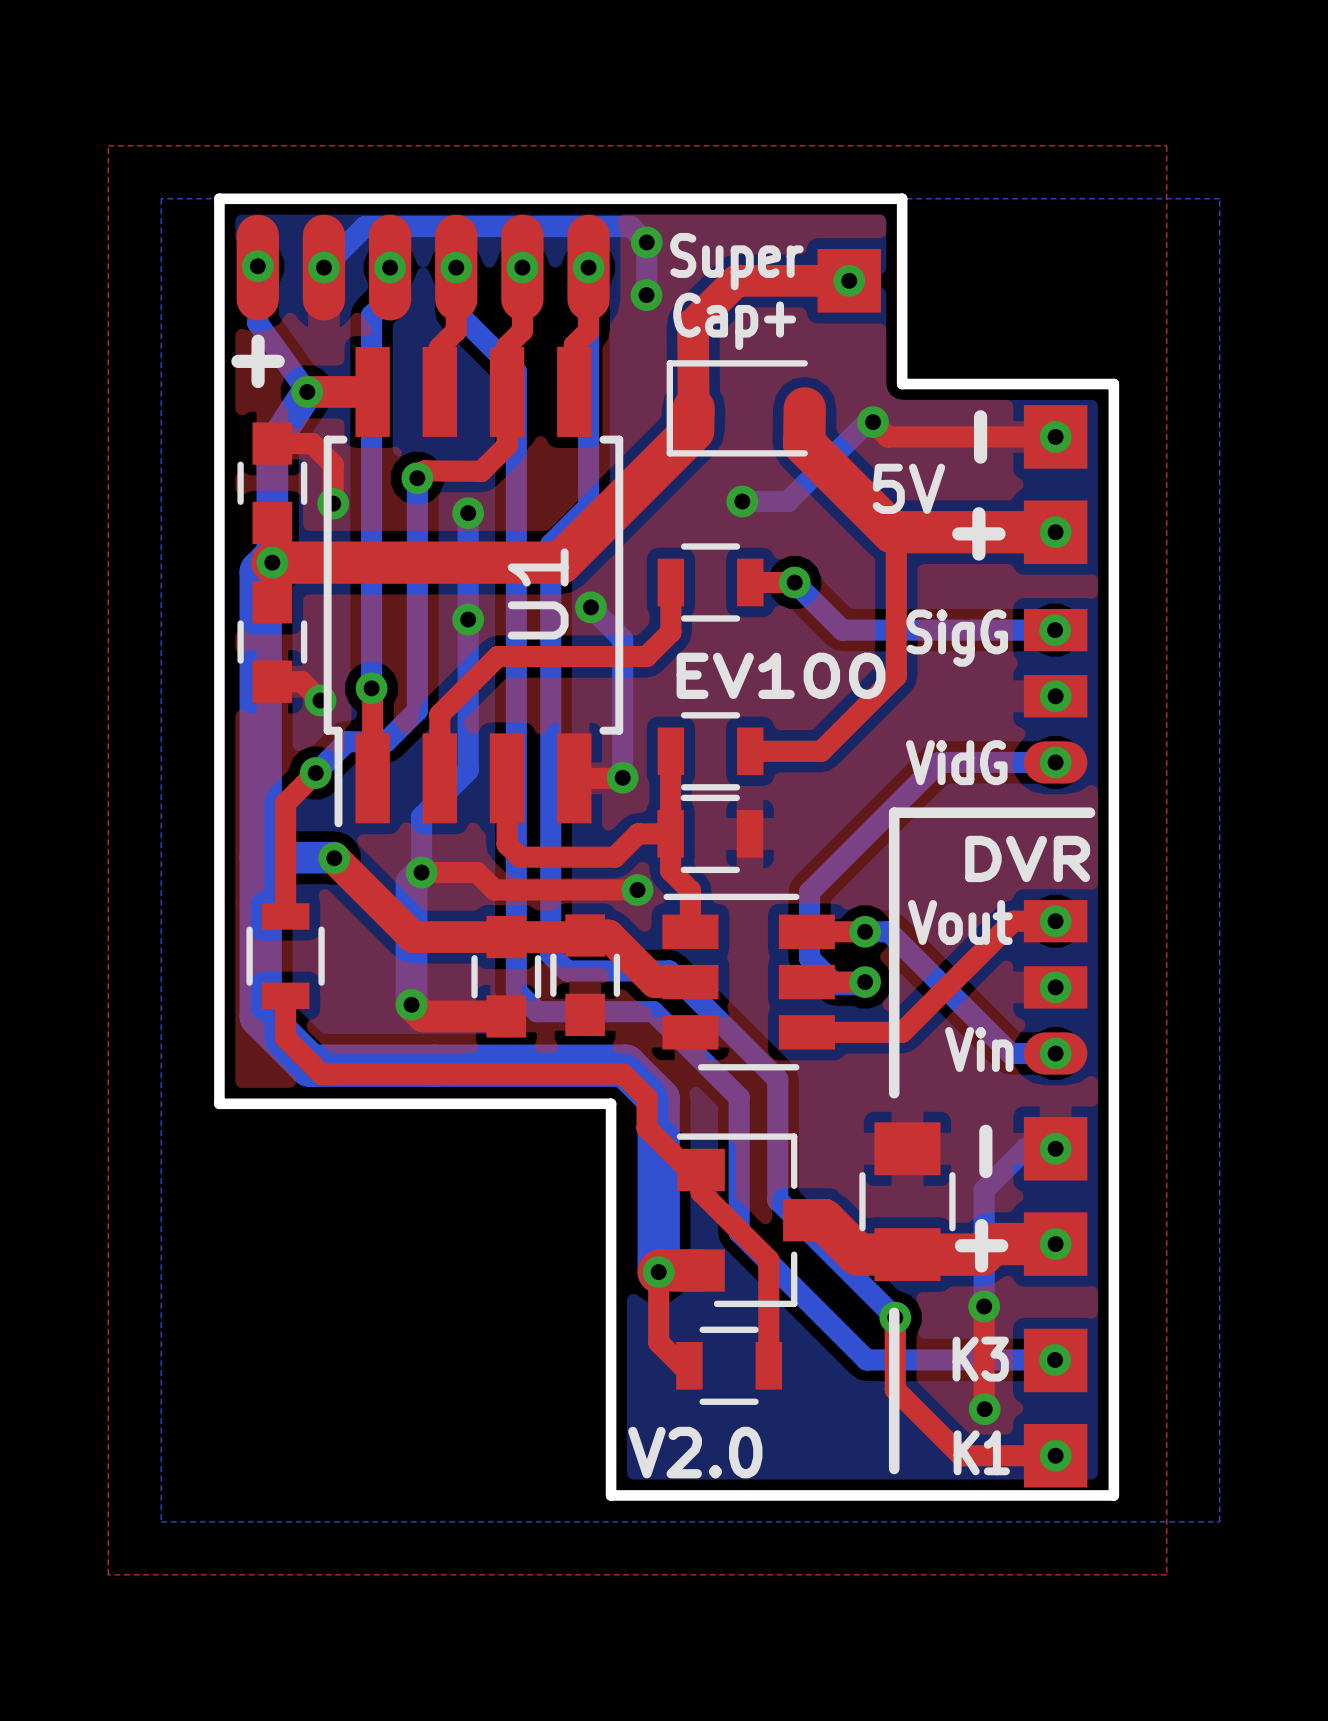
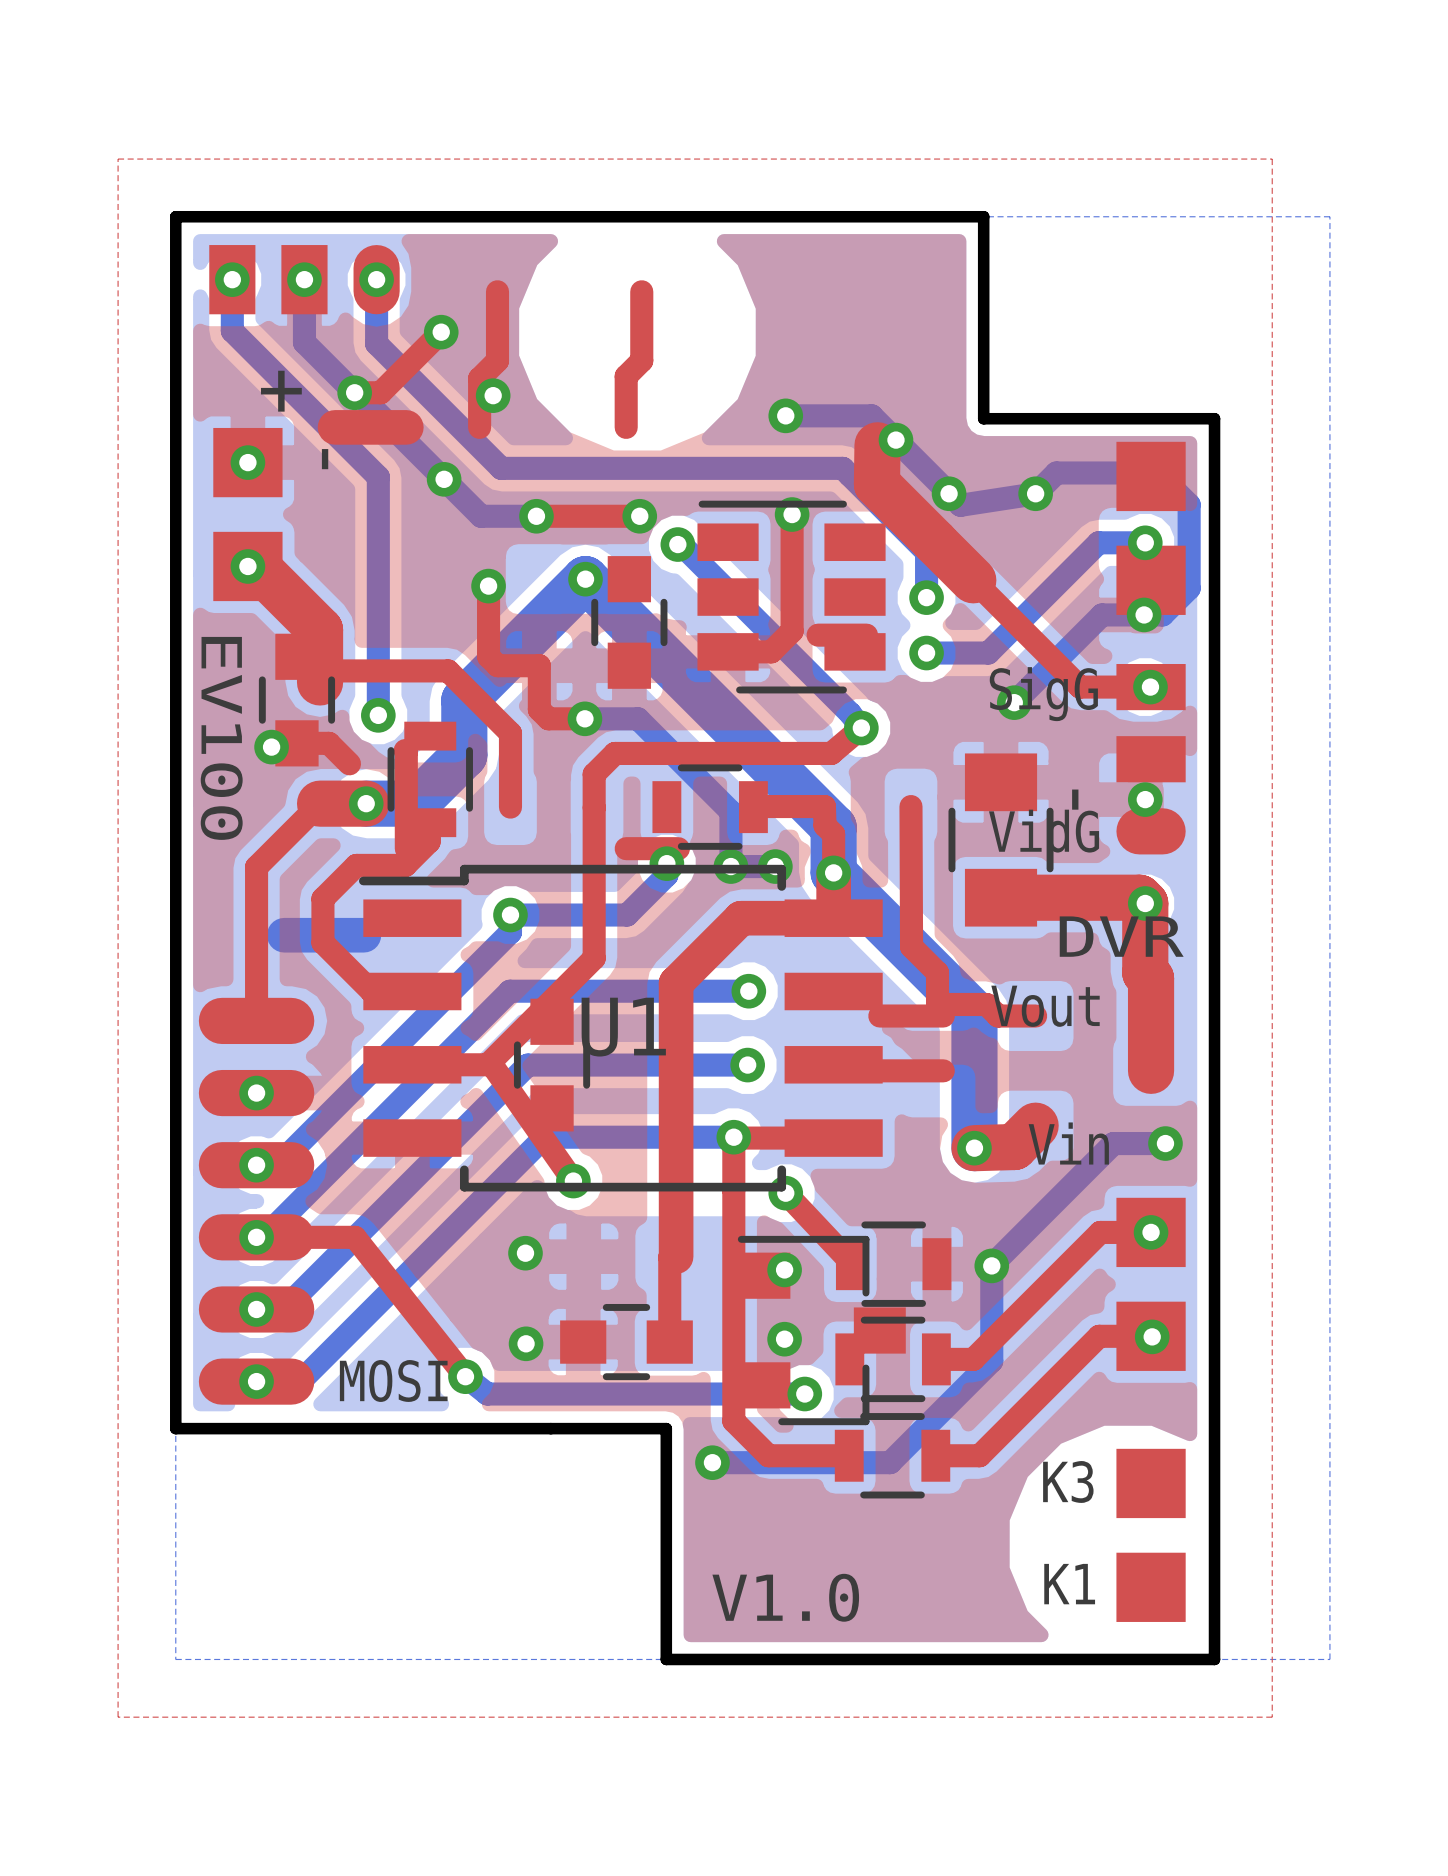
board edge: (219, 198) (219, 1103) (611, 1103) (611, 1310) -> (239, 216) (175, 216) (175, 1428) (666, 1428)
via: (646, 242) -> none
via: none -> (232, 279)
bottom track: none -> (304, 279) (304, 342) (481, 516) (536, 516)
bottom track: none -> (376, 279) (376, 343) (501, 468) (842, 468) (926, 552) (926, 597)
bottom track: none -> (233, 280) (232, 279) (232, 331) (378, 477) (378, 715)
text: Super (736, 261) -> none
bottom track: (257, 266) (257, 323) (307, 391) (272, 446) (272, 562) (260, 571) (260, 1016) (309, 1065) (625, 1065) (658, 1099) (658, 1272) -> none
via position: (257, 266) -> (304, 279)
bottom track: (323, 267) (364, 226) (630, 226) (646, 242) (646, 294) -> none
via position: (323, 267) -> (376, 279)
bottom track: (390, 267) (390, 296) (371, 315) (371, 688) -> none
via: (390, 267) -> none
part rotation: 0° (423, 267) -> 90° clockwise (256, 1201)
part position: (423, 267) -> (256, 1201)
bottom track: (456, 267) (456, 311) (516, 371) (516, 991) (536, 1011) (653, 1011) (739, 1097) (739, 1232) (866, 1359) (1055, 1359) -> none
via: (456, 267) -> none
top track: (522, 267) (522, 330) (507, 346) (507, 445) (481, 471) (424, 470) (417, 478) -> none
via: (522, 267) -> none
bottom track: (588, 267) (588, 506) (550, 544) (550, 954) (567, 970) (669, 970) (777, 1079) (777, 1200) (895, 1317) -> none
via: (588, 267) -> none
top track: (849, 280) (736, 280) (693, 324) (693, 430) (561, 562) (272, 562) -> none
part: (849, 280) -> none
via: (849, 280) -> none
via: (646, 295) -> none
top track: none -> (441, 332) (380, 392) (354, 392)
via: none -> (441, 332)
text: Cap+ (734, 321) -> none
via: none -> (493, 395)
bottom track: none -> (785, 415) (871, 415) (949, 493)
via: none -> (785, 415)
via position: (307, 391) -> (354, 392)
via: none -> (895, 440)
part: (743, 408) -> none
text: none -> - (325, 459)
part footprint: [237, 422, 308, 545] -> [213, 427, 283, 602]
bottom track: (873, 422) (867, 422) (787, 501) (742, 501) -> none
top track: (873, 422) (887, 436) (1055, 436) -> none
via position: (873, 422) -> (949, 493)
via: none -> (247, 462)
text: - (980, 436) -> none
via: (1055, 436) -> none
via: none -> (444, 479)
top track: (272, 443) (312, 443) (333, 464) (333, 503) -> none
bottom track: none -> (949, 493) (960, 505) (1035, 493) (1056, 472) (1157, 472) (1189, 504) (1189, 588) (1162, 614) (1102, 614) (1014, 702)
via: none -> (1035, 493)
top track: none -> (792, 514) (792, 631) (771, 651) (728, 651)
top track: none -> (536, 516) (639, 516)
via: none -> (536, 516)
via: none -> (639, 516)
bottom track: (417, 478) (417, 710) (386, 741) (346, 741) (315, 773) -> none
via: (417, 478) -> none
text: 5V (908, 488) -> none
bottom track: none -> (1145, 542) (1098, 542) (988, 653) (926, 653)
via: none -> (1145, 542)
bottom track: none -> (677, 544) (681, 544) (850, 713) (861, 728)
via: none -> (677, 544)
via position: (742, 501) -> (792, 514)
via: (333, 503) -> none
bottom track: (468, 513) (468, 770) (421, 816) (421, 872) (411, 882) (411, 1004) -> none
via position: (468, 513) -> (488, 586)
top track: none -> (247, 566) (256, 566) (320, 629) (320, 682)
via: none -> (247, 566)
via: none -> (585, 579)
top track: (892, 532) (1055, 532) -> (973, 580) (1080, 687) (1145, 687)
top track: (896, 532) (896, 676) (821, 751) (750, 751) -> none
via: (1055, 532) -> none
text: + (978, 533) -> none
top track: none -> (488, 586) (488, 656) (497, 665) (539, 665) (539, 709) (548, 718) (586, 717)
part footprint: [657, 543, 764, 622] -> [697, 500, 886, 694]
via: none -> (926, 597)
via: (272, 562) -> none
via: none -> (1144, 614)
part: none -> (629, 622)
top track: (670, 582) (670, 632) (646, 656) (497, 656) (439, 714) (439, 778) -> none
bottom track: (794, 582) (842, 630) (1055, 630) -> none
via: (794, 582) -> none
U1 rotation: 0° (473, 587) -> 90° clockwise (620, 1028)
U1 position: (473, 587) -> (620, 1028)
via: none -> (926, 653)
bottom track: (590, 607) (622, 639) (622, 777) -> none
via: (590, 607) -> none
via: (468, 619) -> none
top track: none -> (320, 681) (330, 670) (448, 670) (510, 733) (510, 807)
via: none -> (1014, 702)
via: none -> (378, 715)
via: none -> (584, 718)
bottom track: none -> (584, 720) (584, 718) (638, 718) (730, 811) (730, 866) (775, 866)
via: none -> (861, 728)
top track: none -> (859, 730) (861, 728) (831, 753) (614, 753) (594, 774) (594, 958) (487, 1064) (412, 1064) (418, 1070)
text rotation: 0° (781, 675) -> 90° clockwise (221, 738)
text position: EV100 (781, 675) -> EV100 (221, 738)
via: none -> (271, 747)
via: (371, 688) -> none
via: (1055, 696) -> none
via: (320, 700) -> none
part: none -> (430, 779)
text: none -> - (1075, 799)
bottom track: none -> (366, 803) (415, 803) (464, 755) (464, 700) (585, 579) (833, 827) (833, 872) (974, 1013) (974, 1148)
top track: none -> (366, 803) (320, 803) (256, 867) (256, 1020)
via: none -> (366, 803)
top track: none -> (754, 806) (824, 806) (825, 825) (833, 834) (833, 918) (741, 918) (676, 983) (676, 1256)
top track: none -> (910, 806) (911, 946) (937, 972) (937, 1004) (986, 1004) (998, 1016) (1035, 1016)
part: none -> (710, 807)
top track: (670, 751) (670, 870) (690, 890) (690, 931) -> none
part: (710, 751) -> none
top track: none -> (430, 822) (429, 841) (405, 865) (356, 865) (322, 898) (322, 942) (371, 991) (412, 991)
bottom track: (1055, 762) (939, 762) (809, 892) (809, 958) (836, 984) (862, 984) (865, 982) -> none
via position: (1055, 762) -> (1145, 799)
top track: (315, 773) (285, 803) (285, 916) -> none
via: (315, 773) -> none
via position: (622, 777) -> (666, 863)
top track: (507, 778) (507, 844) (520, 857) (614, 857) (638, 833) (670, 833) -> none
bottom track: none -> (666, 863) (666, 875) (627, 915) (510, 915) (510, 932) (279, 1163) (258, 1163) (256, 1165)
via: none -> (730, 866)
via: none -> (775, 866)
via: none -> (833, 872)
line: (1090, 812) (894, 812) (894, 1093) -> none
top track: none -> (1001, 897) (1139, 897) (1145, 903) (1145, 972) (1151, 978) (1151, 1070)
via: none -> (1145, 903)
part: (710, 833) -> none
top track: (334, 858) (413, 937) (608, 935) (654, 982) (690, 982) -> none
via: (334, 858) -> none
top track: (421, 872) (477, 872) (494, 889) (637, 889) -> none
via position: (421, 872) -> (510, 915)
via: (637, 889) -> none
bottom track: none -> (748, 991) (509, 991) (263, 1237) (256, 1237)
via: none -> (748, 991)
top track: (1055, 921) (1013, 921) (902, 1032) (806, 1032) -> none
via: (1055, 921) -> none
bottom track: (865, 931) (888, 931) (1010, 1053) (1055, 1053) -> none
via: (865, 931) -> none
part: (285, 956) -> none
top track: none -> (489, 1063) (573, 1181)
part: (585, 975) -> none
bottom track: none -> (747, 1065) (527, 1065) (283, 1309) (256, 1309)
via: none -> (747, 1065)
part: (748, 982) -> none
via: (865, 982) -> none
part rotation: 0° (1055, 987) -> 90° counterclockwise (304, 279)
part position: (1055, 987) -> (304, 279)
via: (1055, 987) -> none
top track: (285, 995) (285, 1038) (321, 1074) (623, 1074) (647, 1097) (647, 1128) (688, 1169) (701, 1169) -> none
via: none -> (256, 1093)
top track: (411, 1004) (423, 1016) (506, 1016) -> none
via: (411, 1004) -> none
top track: none -> (1035, 1125) (1014, 1147) (974, 1148)
bottom track: none -> (733, 1137) (544, 1137) (297, 1384) (259, 1384) (256, 1381)
via: none -> (733, 1137)
top track: none -> (833, 1138) (733, 1137) (733, 1421) (768, 1455) (849, 1455)
bottom track: none -> (1165, 1143) (1113, 1143) (991, 1265) (991, 1361) (890, 1462) (712, 1462)
via: none -> (974, 1148)
via position: (1055, 1053) -> (1165, 1143)
via: none -> (256, 1165)
via: none -> (573, 1181)
top track: none -> (785, 1193) (850, 1261) (850, 1264)
via: none -> (785, 1193)
top track: none -> (256, 1237) (354, 1237) (465, 1376)
via: none -> (256, 1237)
top track: none -> (1133, 1249) (1151, 1232) (1100, 1232) (973, 1359) (936, 1359)
bottom track: (1055, 1148) (1025, 1148) (984, 1190) (984, 1306) -> none
via position: (1055, 1148) -> (1151, 1232)
via: none -> (525, 1253)
text: - (985, 1151) -> none
top track: none -> (669, 1257) (669, 1342)
part: none -> (893, 1264)
via: none -> (991, 1265)
via: none -> (784, 1269)
top track: (701, 1165) (701, 1192) (768, 1259) (768, 1365) -> none
part position: (1055, 1196) -> (1151, 1284)
via: none -> (256, 1309)
part position: (907, 1201) -> (1001, 840)
top track: (806, 1220) (823, 1220) (858, 1254) (981, 1254) (992, 1244) (1055, 1244) -> none
top track: none -> (1151, 1336) (1099, 1336) (979, 1455) (935, 1455)
via: none -> (784, 1339)
part: none -> (626, 1342)
via: none -> (526, 1343)
via position: (1055, 1244) -> (1152, 1336)
text: + (981, 1245) -> none
part: none -> (893, 1359)
bottom track: none -> (465, 1376) (487, 1394) (804, 1394)
via: none -> (465, 1376)
text: none -> MOSI (393, 1380)
via: none -> (256, 1381)
top track: (701, 1270) (660, 1270) (658, 1272) (658, 1342) (681, 1365) (689, 1365) -> none
via: (658, 1272) -> none
via: none -> (804, 1394)
top track: (984, 1306) (984, 1408) -> none
via: (984, 1306) -> none
line: (894, 1312) (894, 1468) -> none
top track: (895, 1317) (895, 1389) (961, 1455) (1055, 1455) -> none
via: (895, 1317) -> none
part: none -> (892, 1455)
via: none -> (712, 1462)
via: (1055, 1359) -> none
part: (729, 1365) -> none
via: (984, 1409) -> none
text: V2.0 (695, 1452) -> V1.0 (785, 1597)
via: (1055, 1455) -> none
board edge: (611, 1495) (1113, 1495) -> (666, 1630) (666, 1659) (1214, 1659) (1214, 1630)

